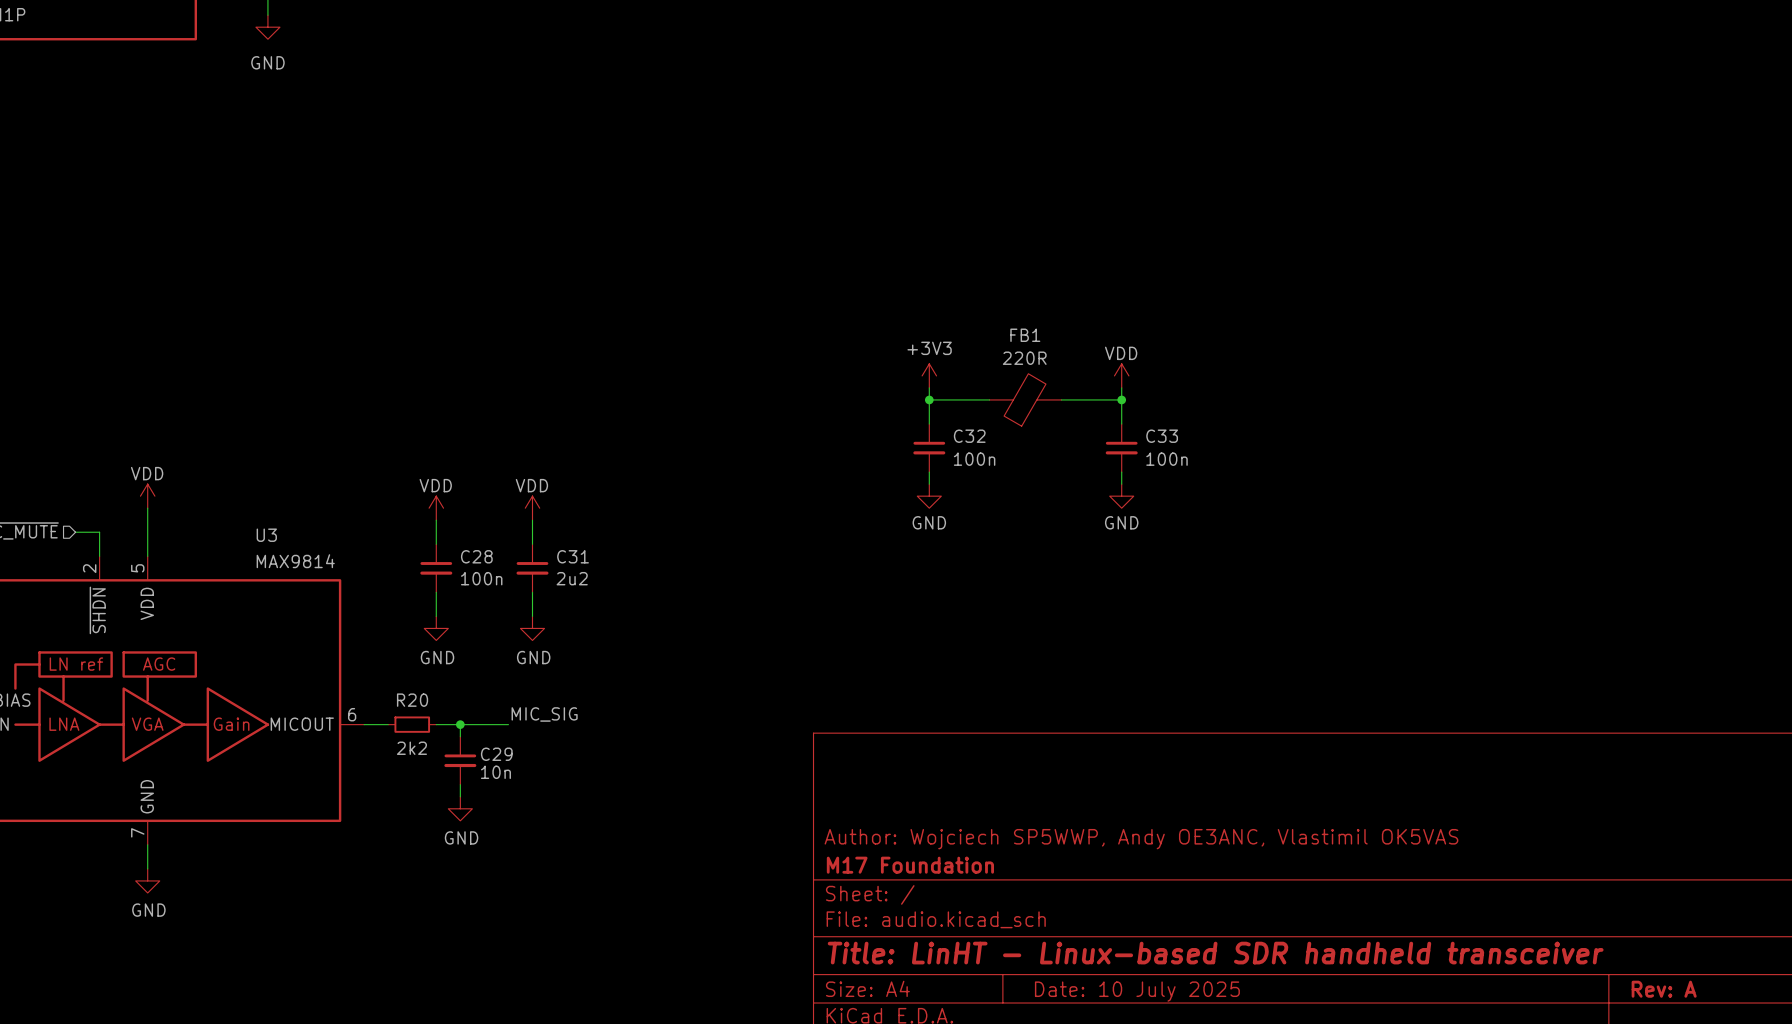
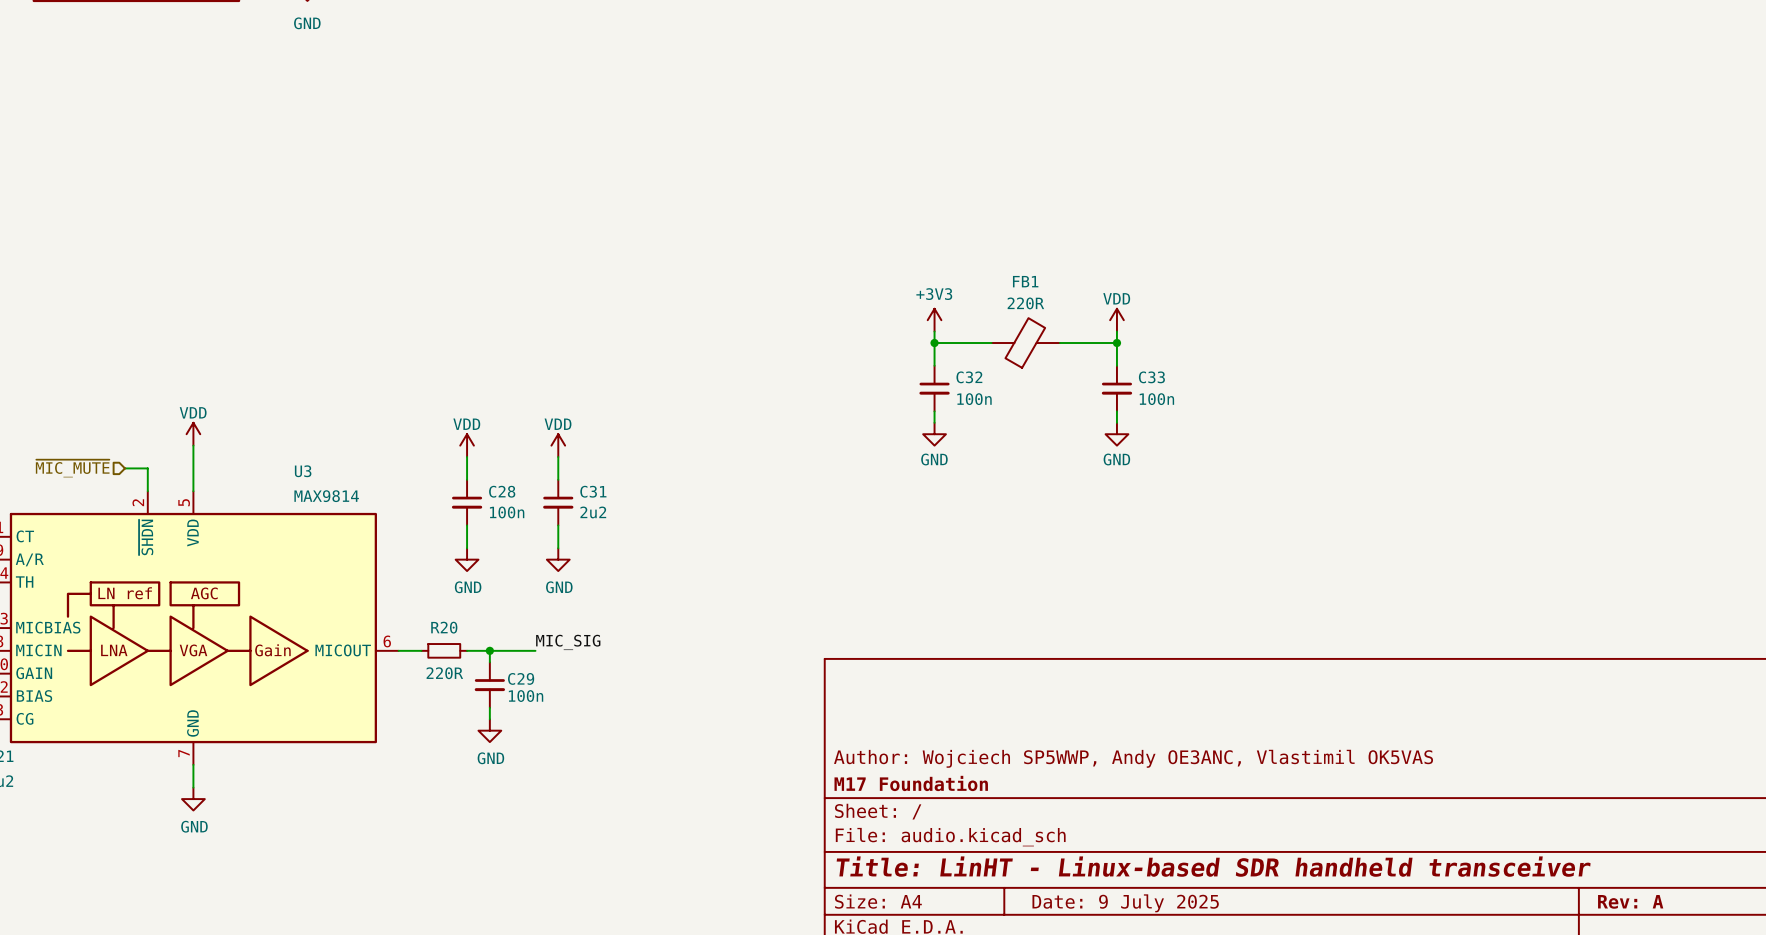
R20 value: 2k2 (411, 748) -> 220R (444, 673)
C29 value: 10n (495, 772) -> 100n (526, 696)
title block: Date: 10 July 2025 (1137, 991) -> Date: 9 July 2025 (1125, 903)

